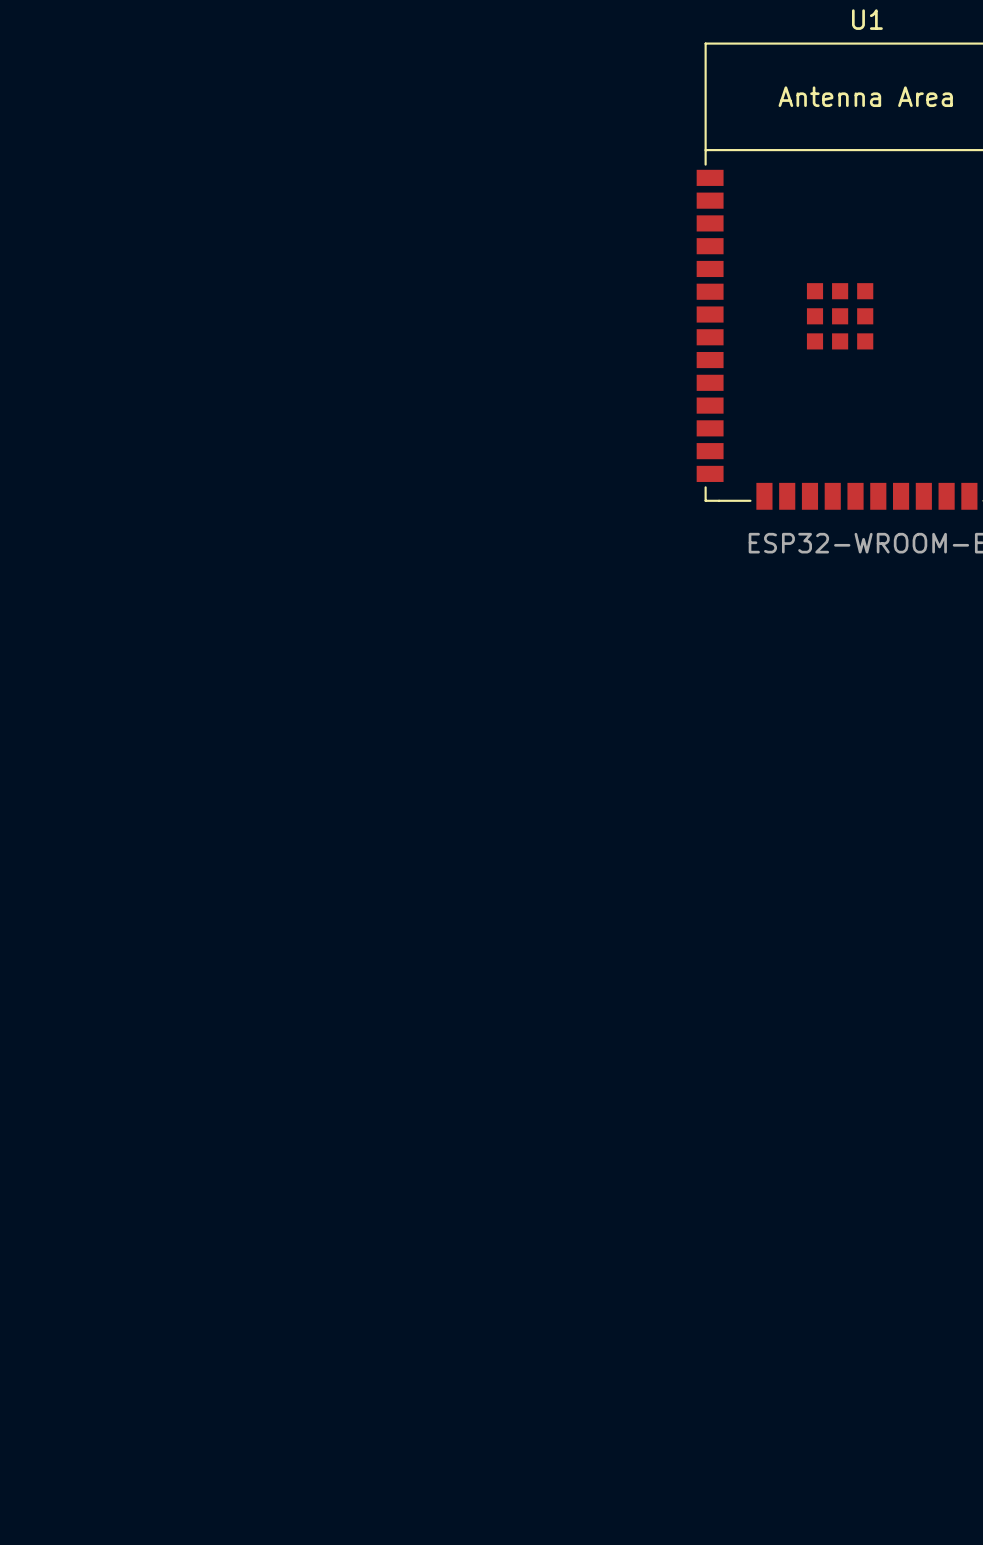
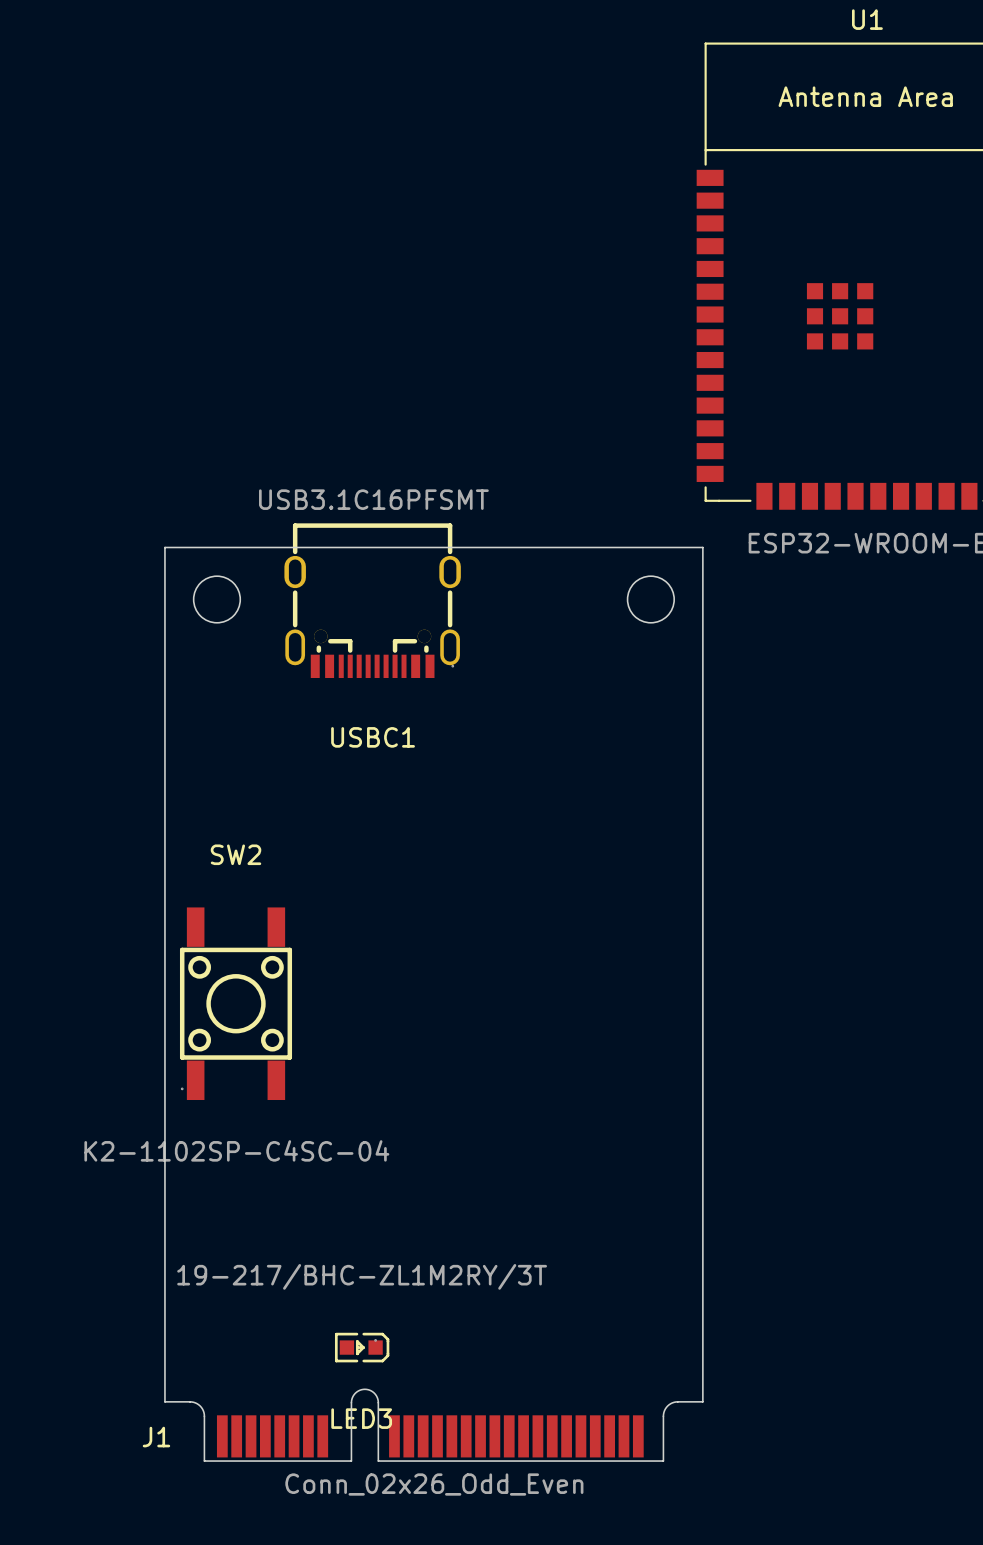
USBC1: none -> USB3.1C16PFSMT (372, 600)
SW2: none -> K2-1102SP-C4SC-04 (236, 1003)
J1: none -> Conn_02x26_Odd_Even (433, 1004)
LED3: none -> 19-217/BHC-ZL1M2RY/3T (362, 1347)

